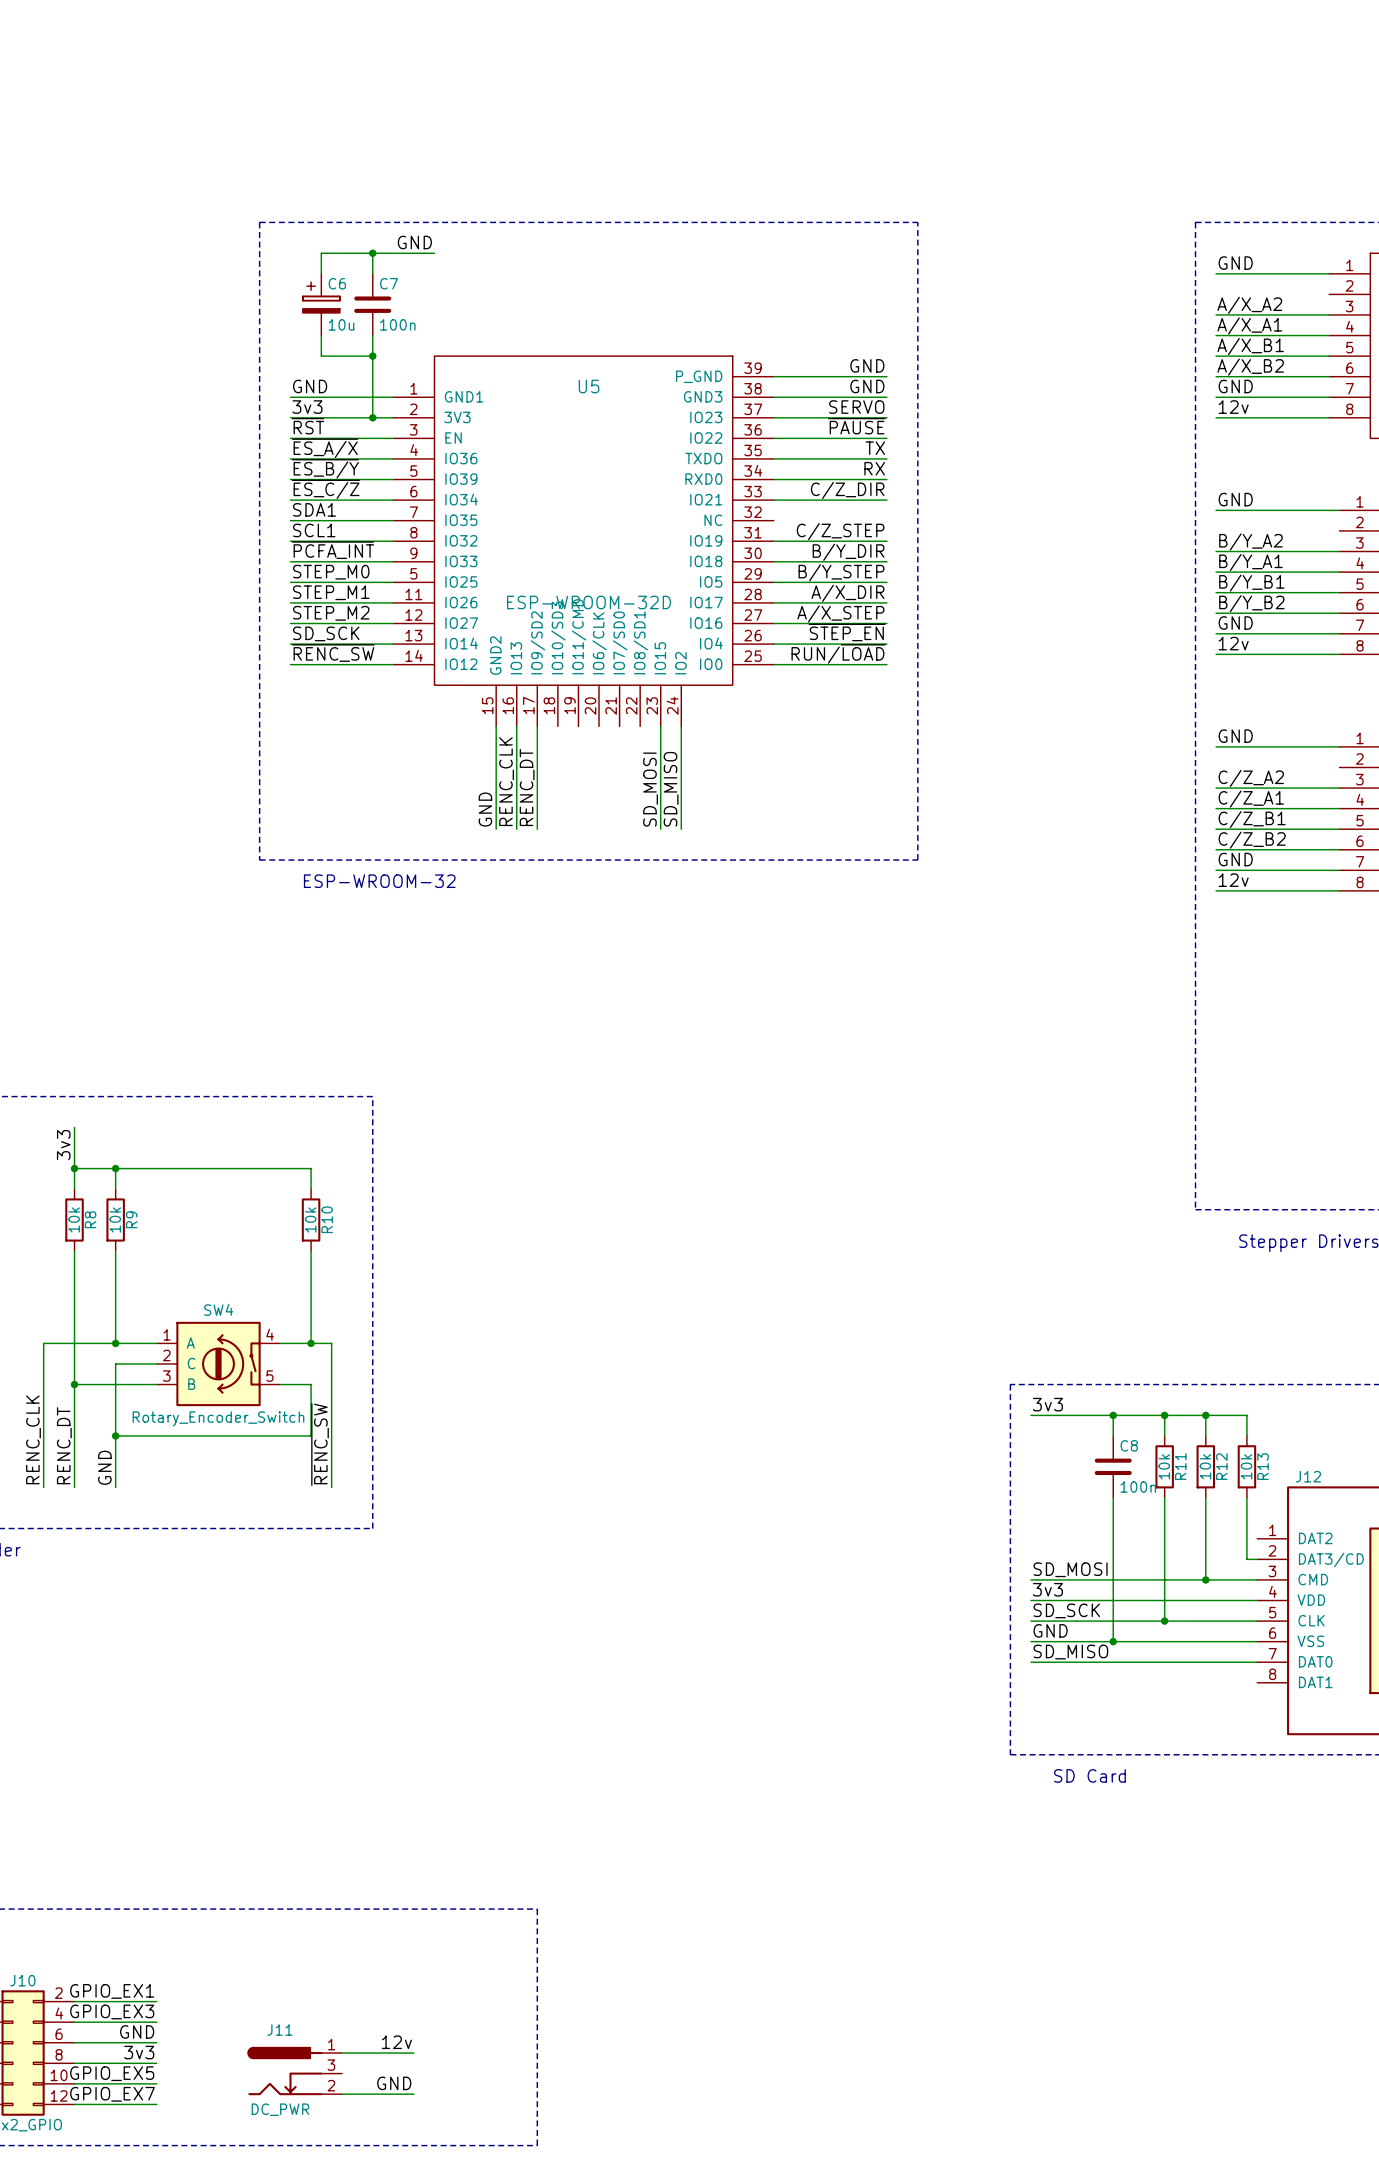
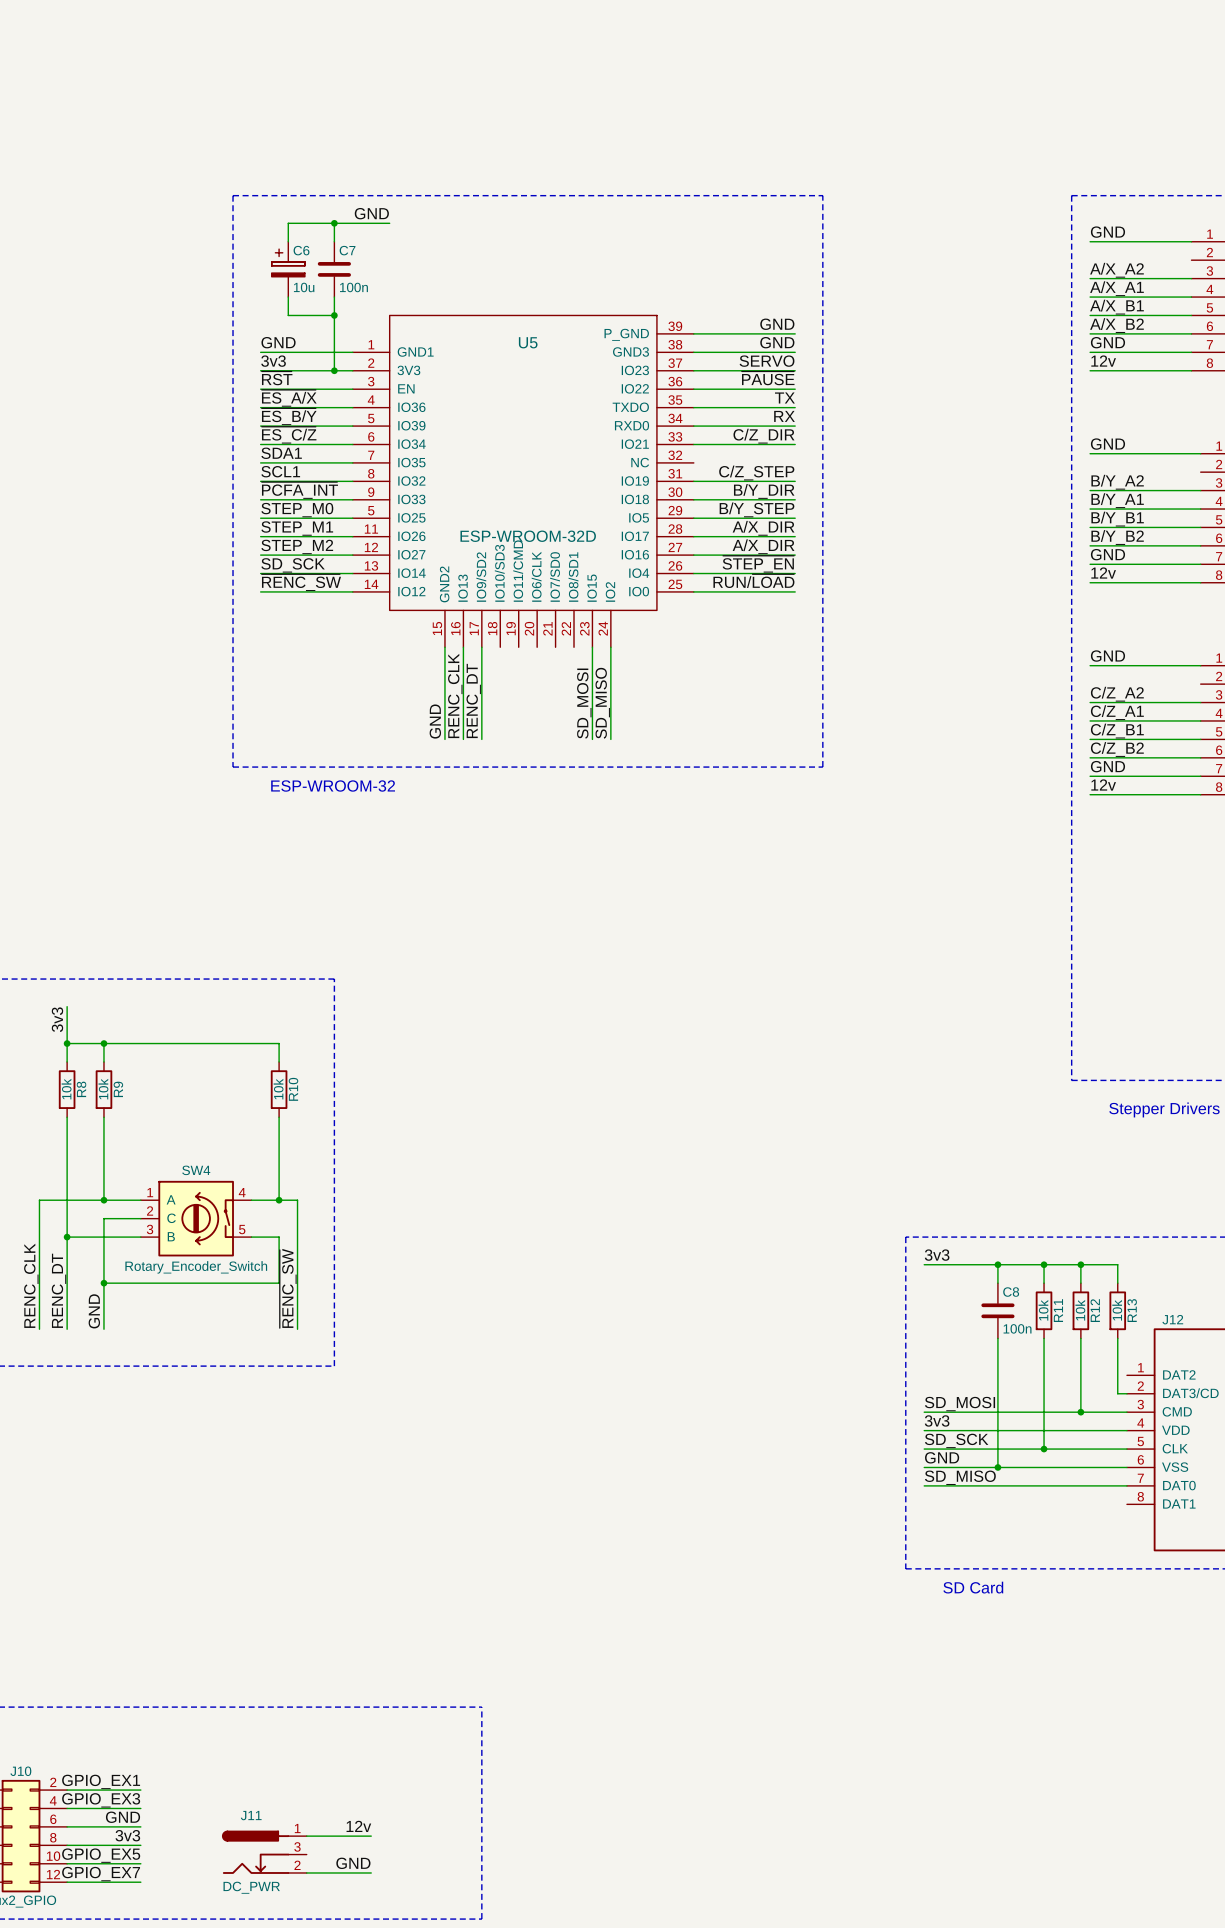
label: A/X_STEP (840, 613) -> A/X_DIR (763, 546)

